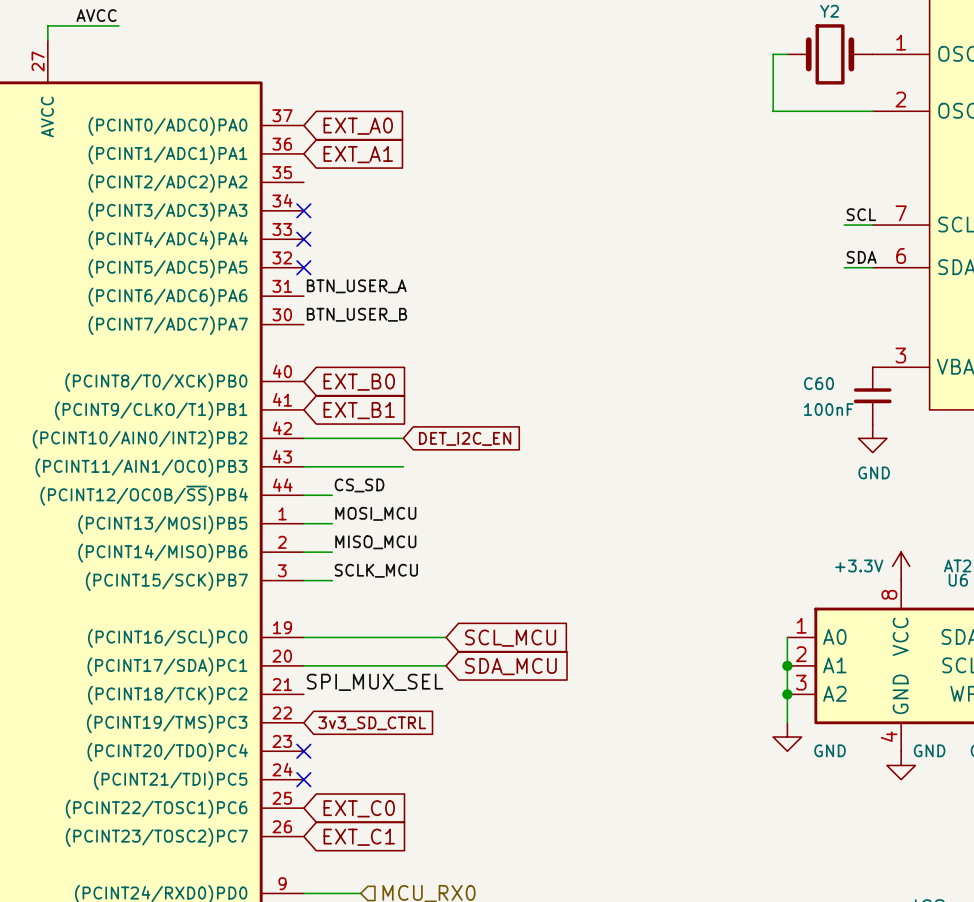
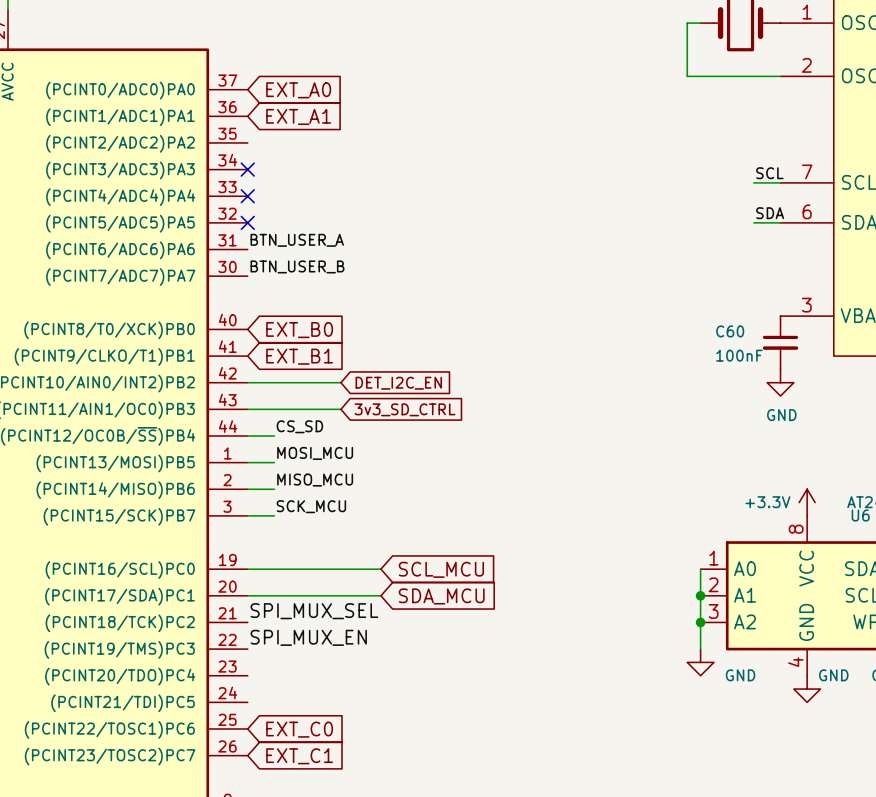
label: SCLK_MCU (376, 570) -> SCK_MCU (311, 506)
label: none -> SPI_MUX_EN (308, 637)
global label position: 3v3_SD_CTRL (372, 723) -> 3v3_SD_CTRL (405, 409)
no-connect mark: (303, 751) -> none
no-connect mark: (303, 779) -> none

